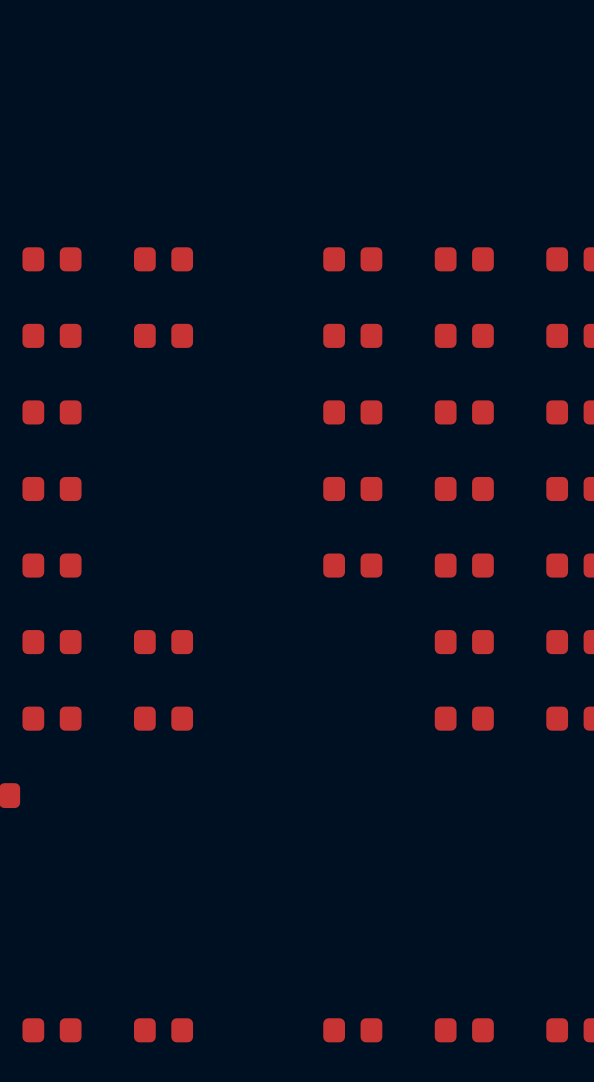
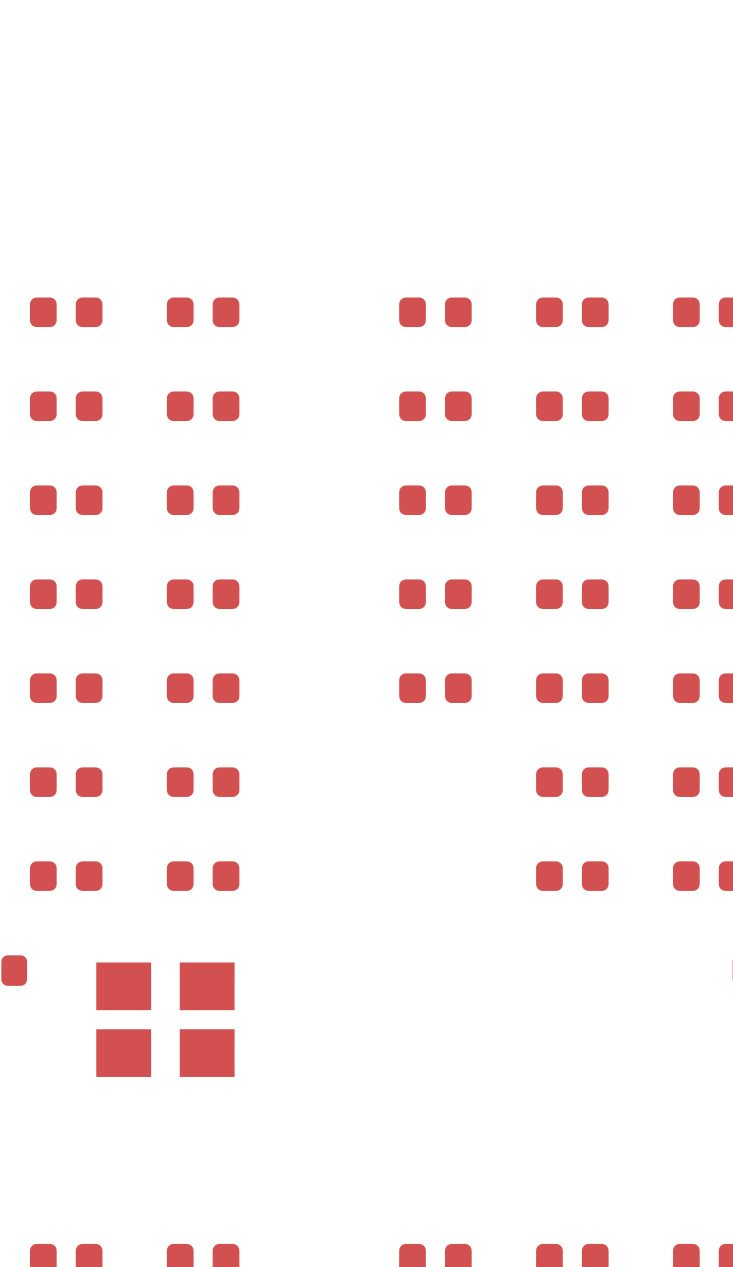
part: none -> (203, 500)
part: none -> (203, 594)
part: none -> (203, 688)
part: none -> (165, 1019)

